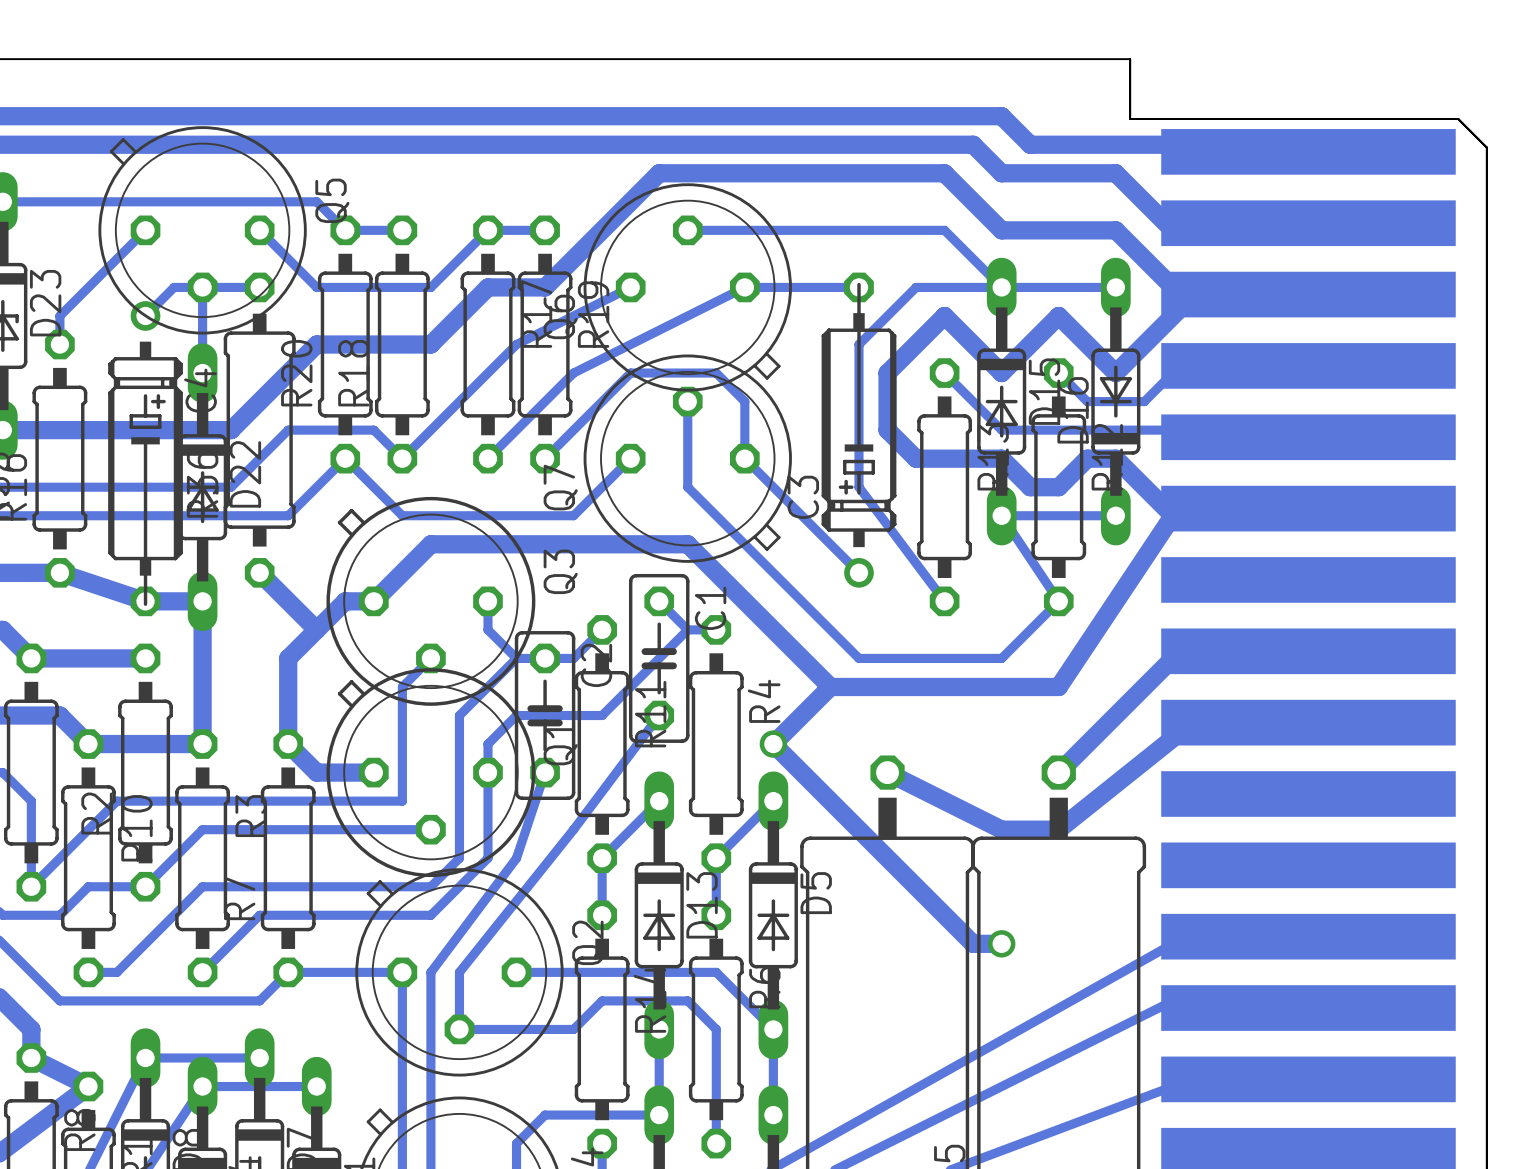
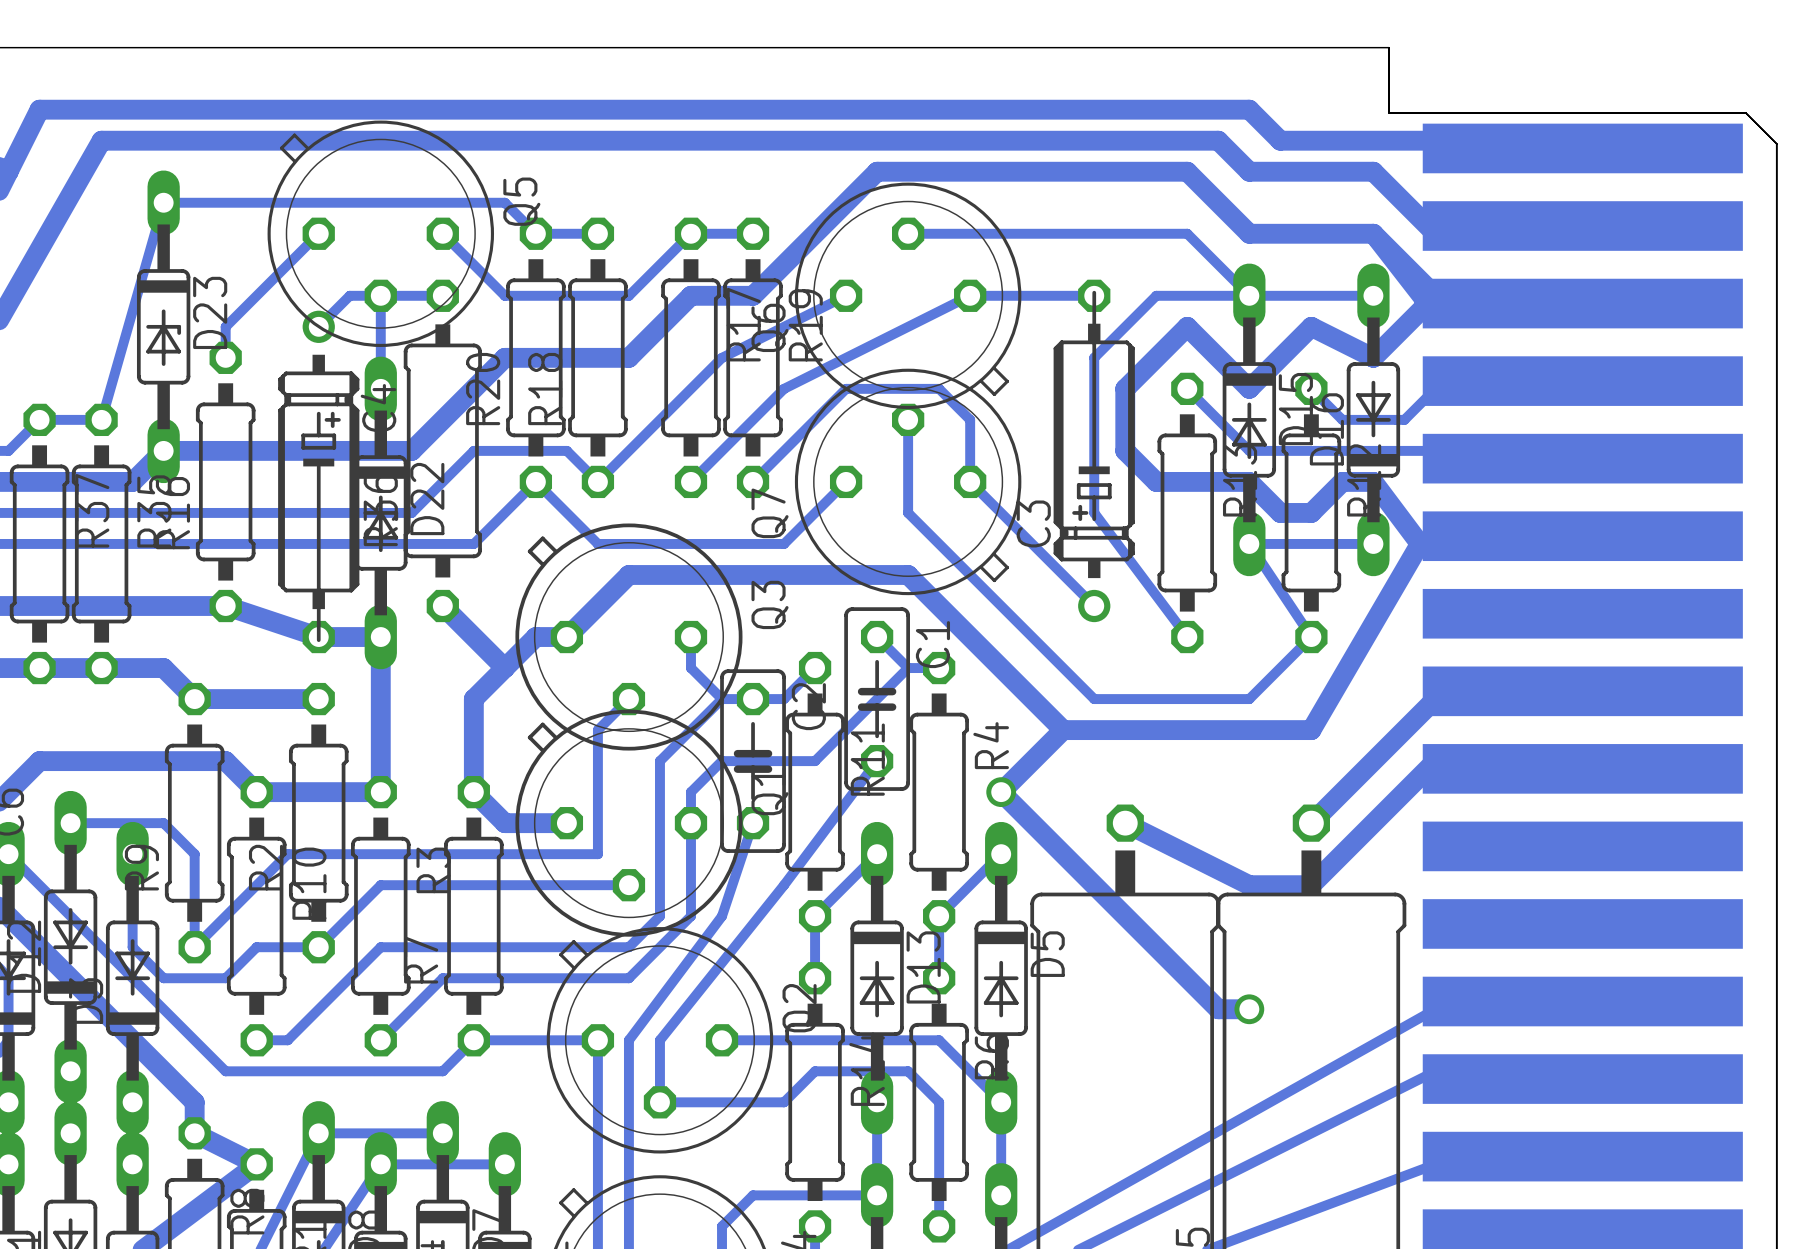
bottom track: (1201, 287) (1115, 373) (1058, 315) -> (1373, 233) (1427, 303) (1373, 357) (1311, 326)
bottom track: (1115, 458) (1172, 515) (1058, 686) -> (1419, 543) (1311, 730)
bottom track: none -> (1373, 481) (1419, 543)
bottom track: (1201, 715) (1058, 829) -> (1466, 761) (1435, 761) (1311, 885)

